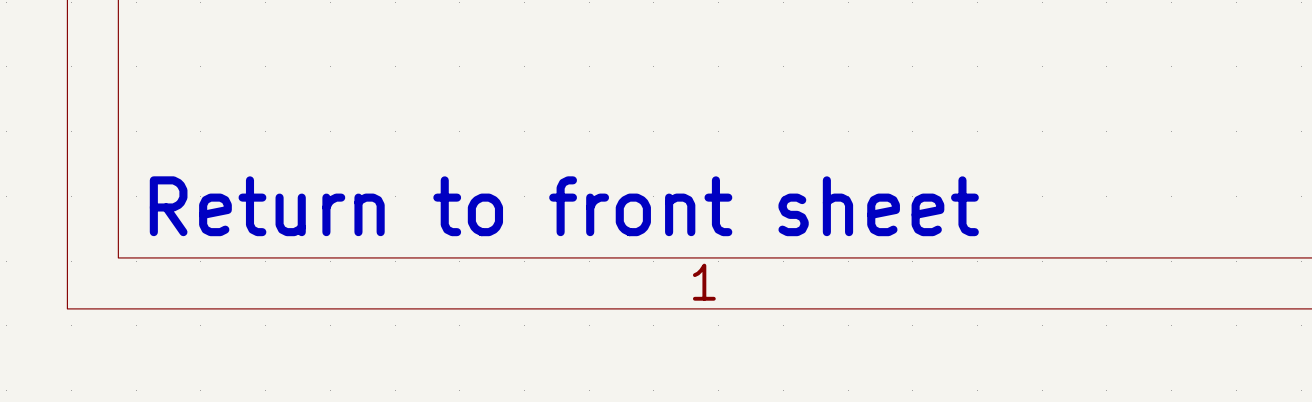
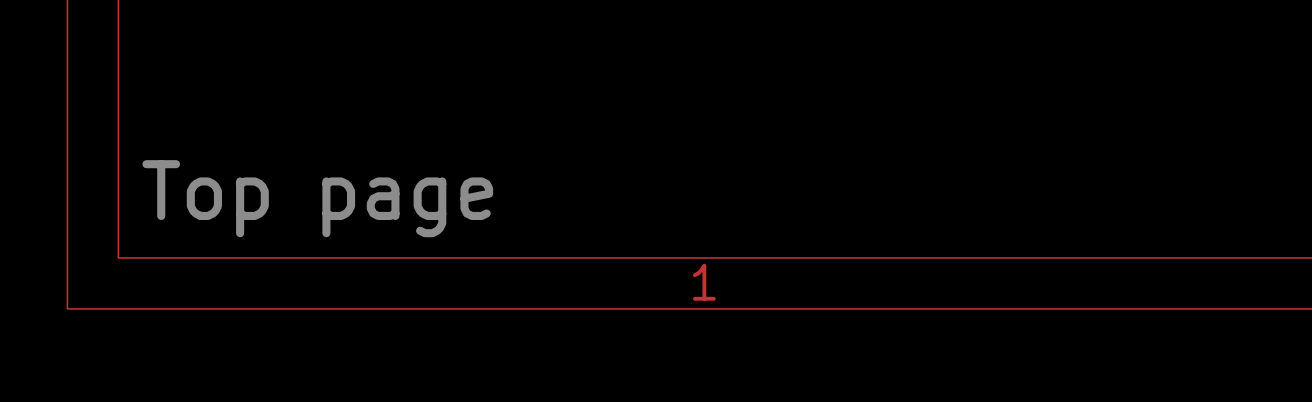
text: Return to front sheet (564, 206) -> Top page (317, 198)

